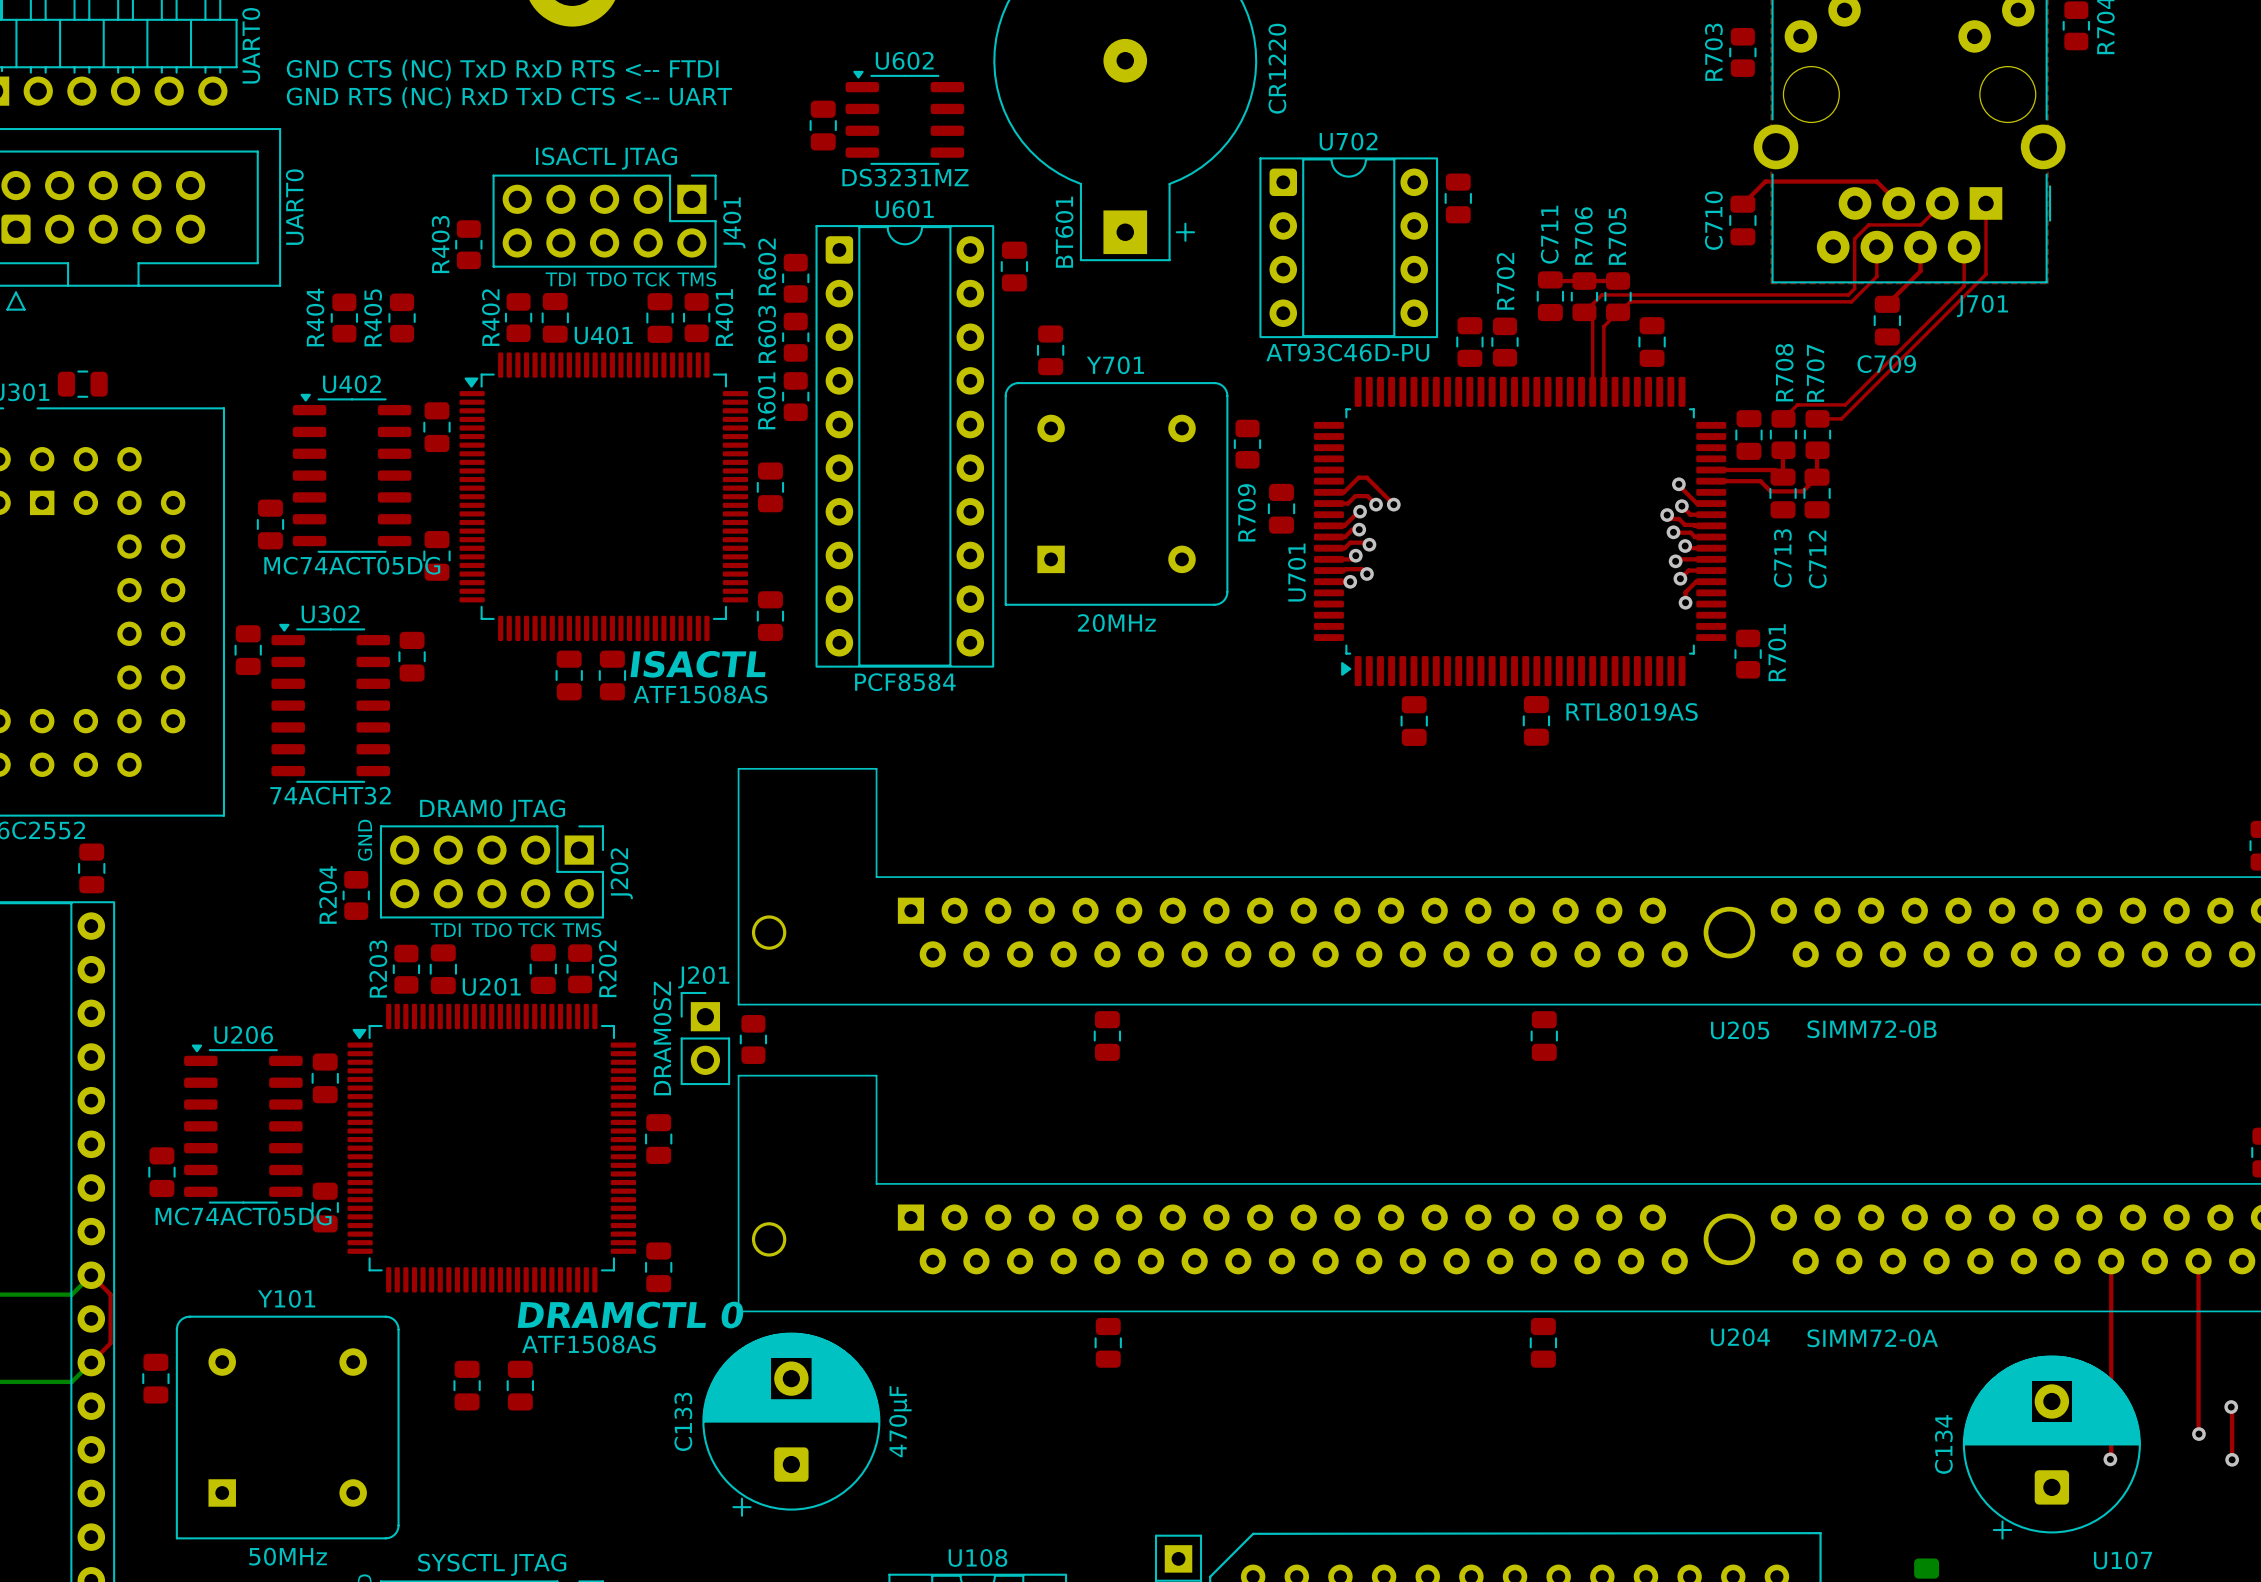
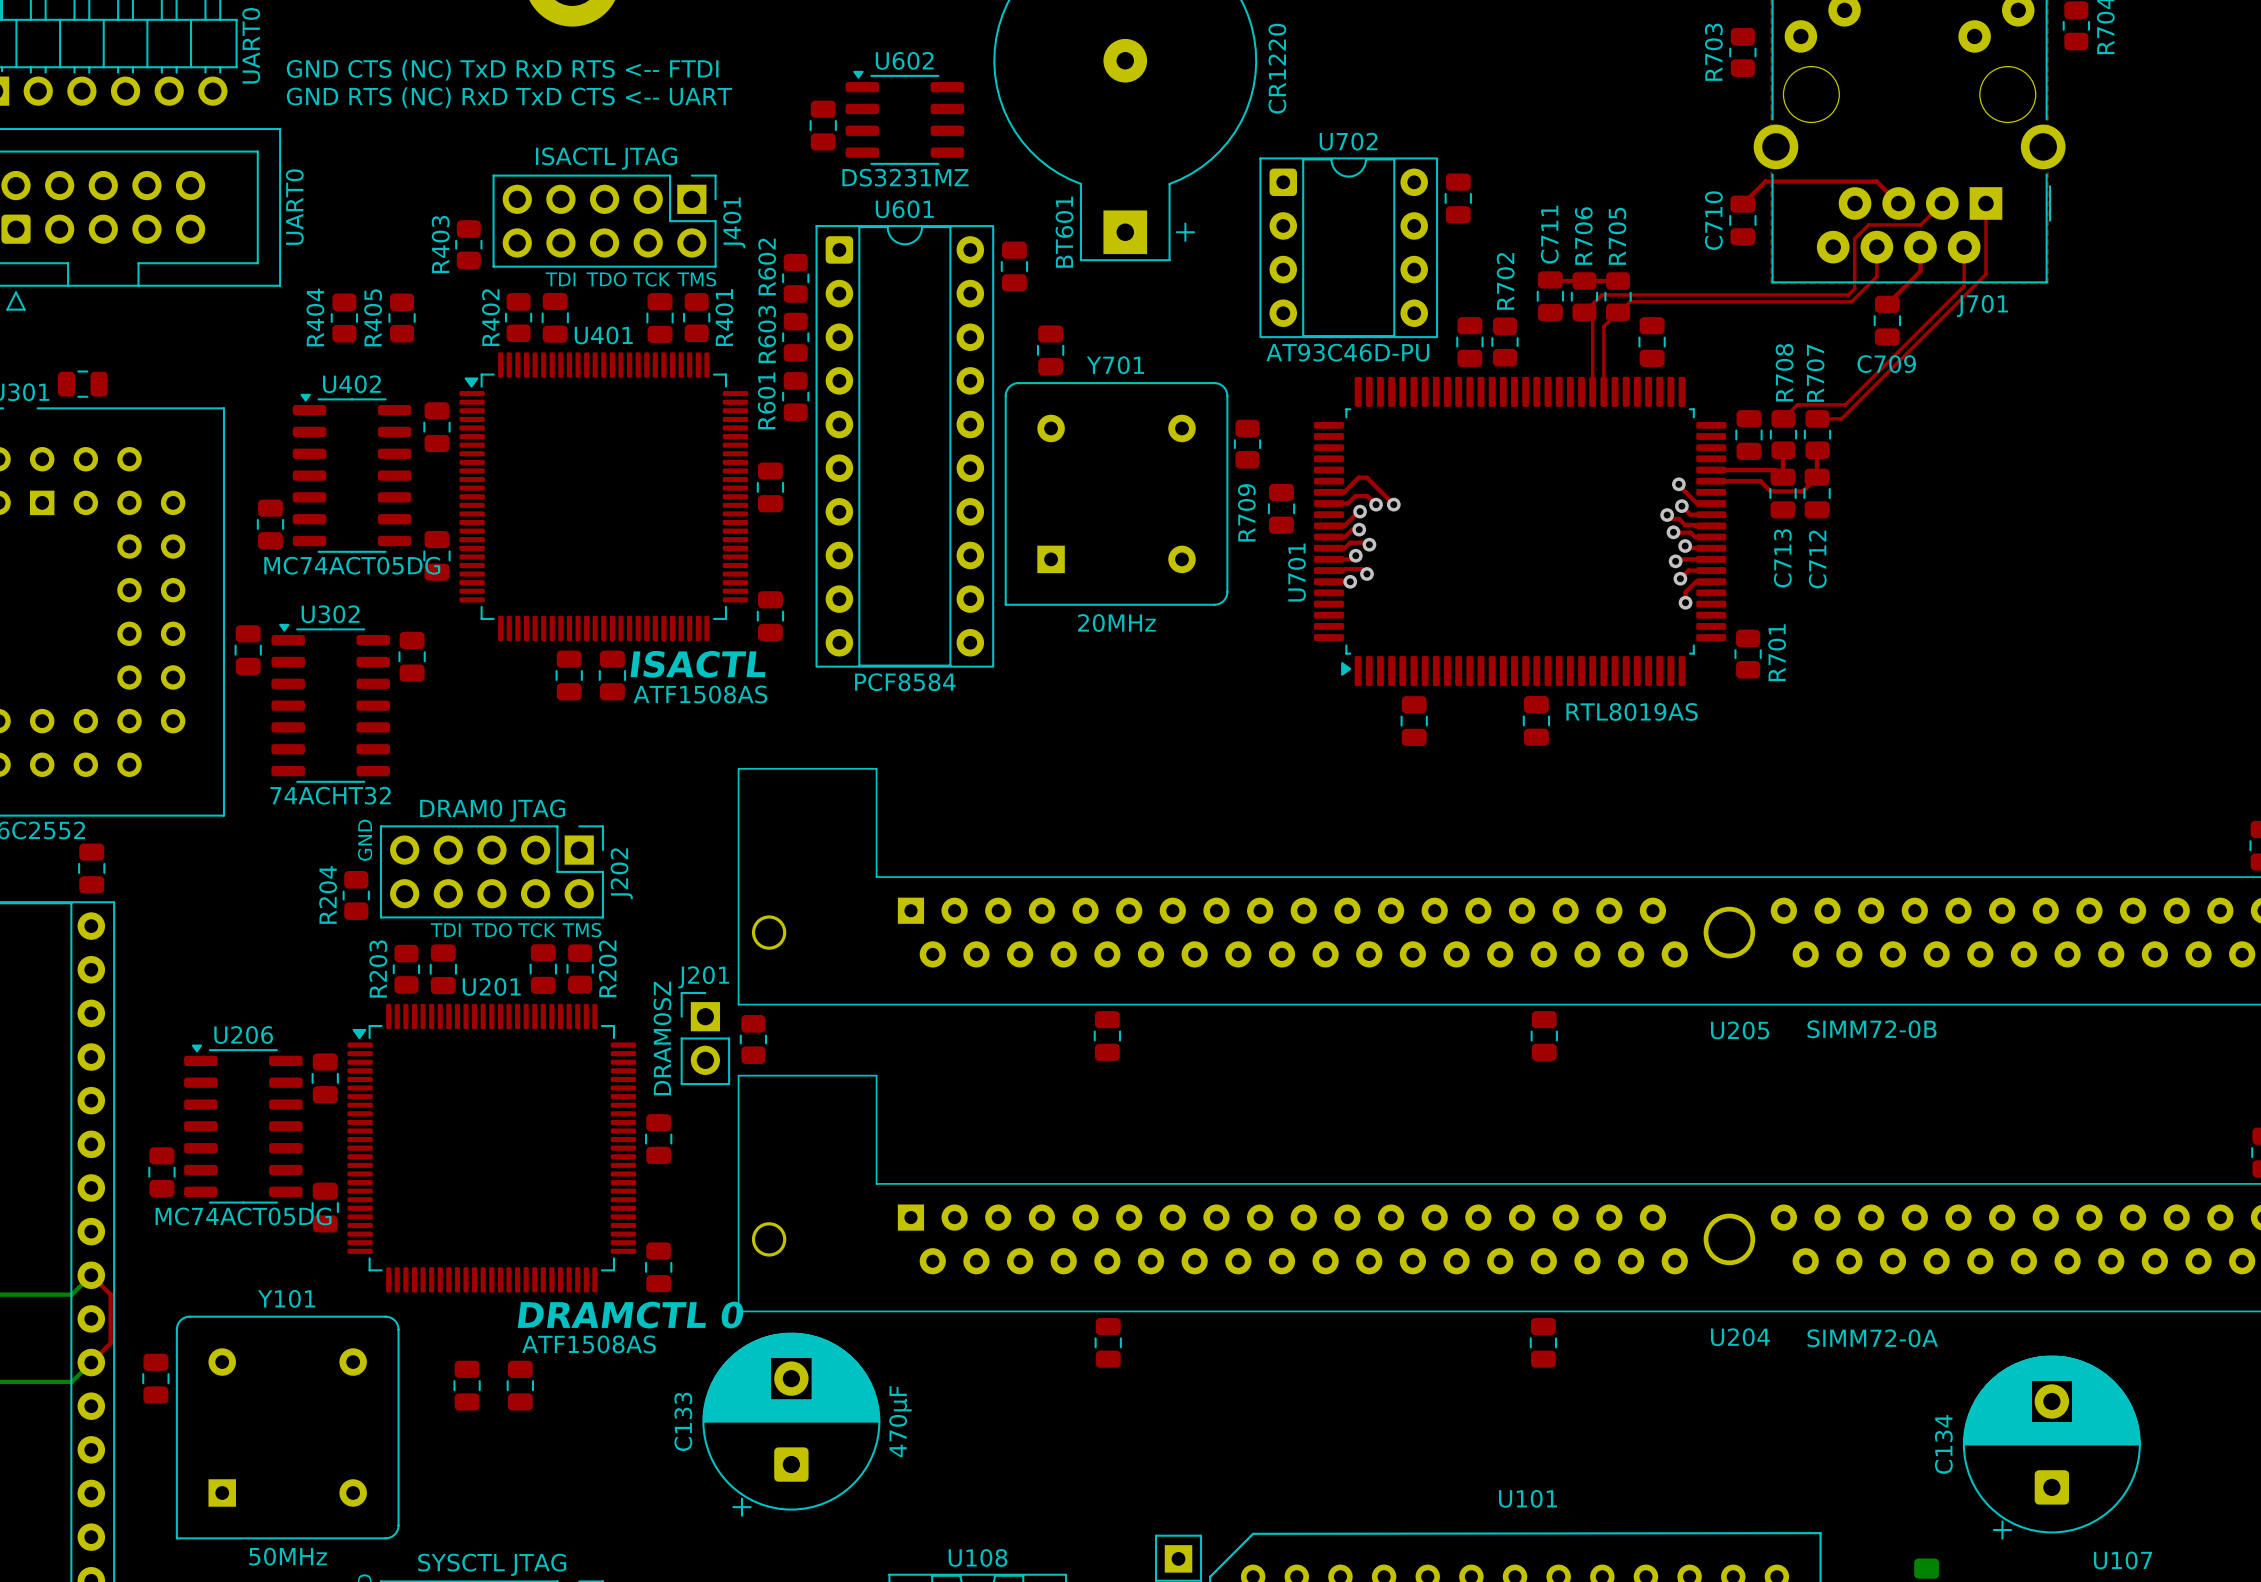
top track: (2111, 1261) (2110, 1459) -> none
top track: (2198, 1261) (2198, 1434) -> none
top track: (2231, 1407) (2232, 1459) -> none
via: (2231, 1407) -> none
via: (2198, 1434) -> none
via: (2110, 1459) -> none
via: (2232, 1459) -> none
U101 name: none -> U101 (1528, 1498)

